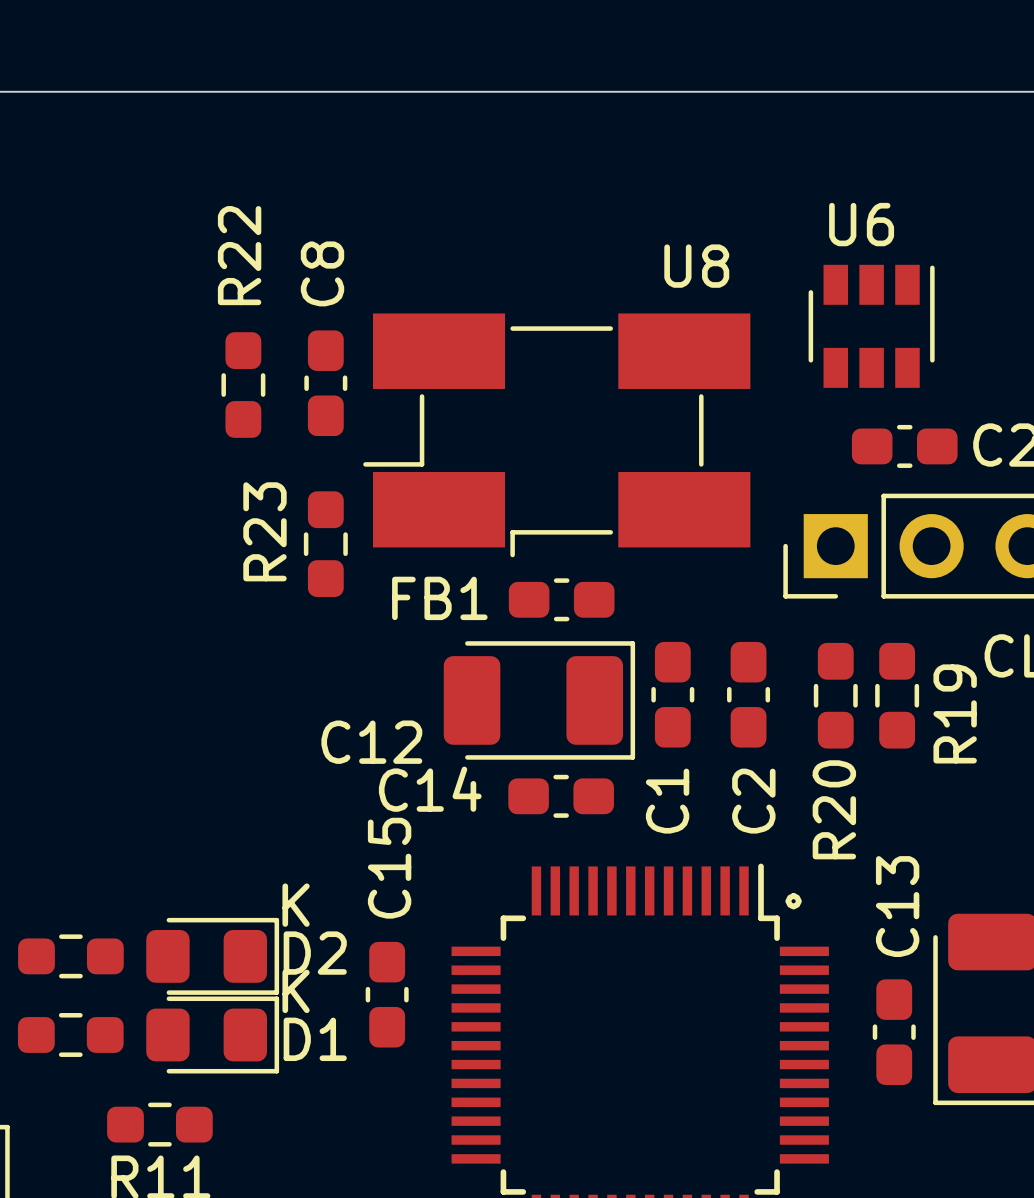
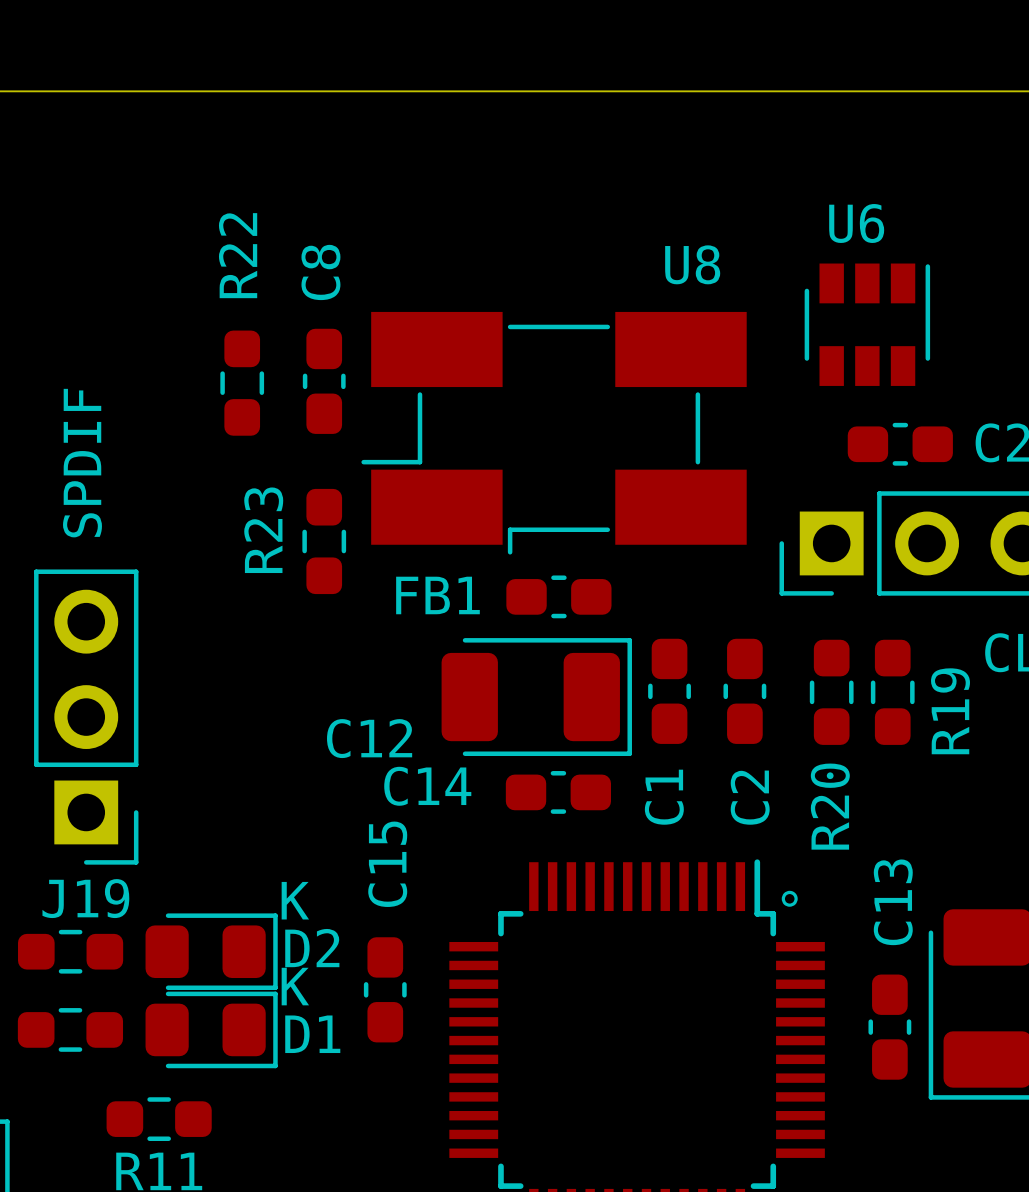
text: none -> SPDIF (82, 463)
J19: none -> (86, 717)

